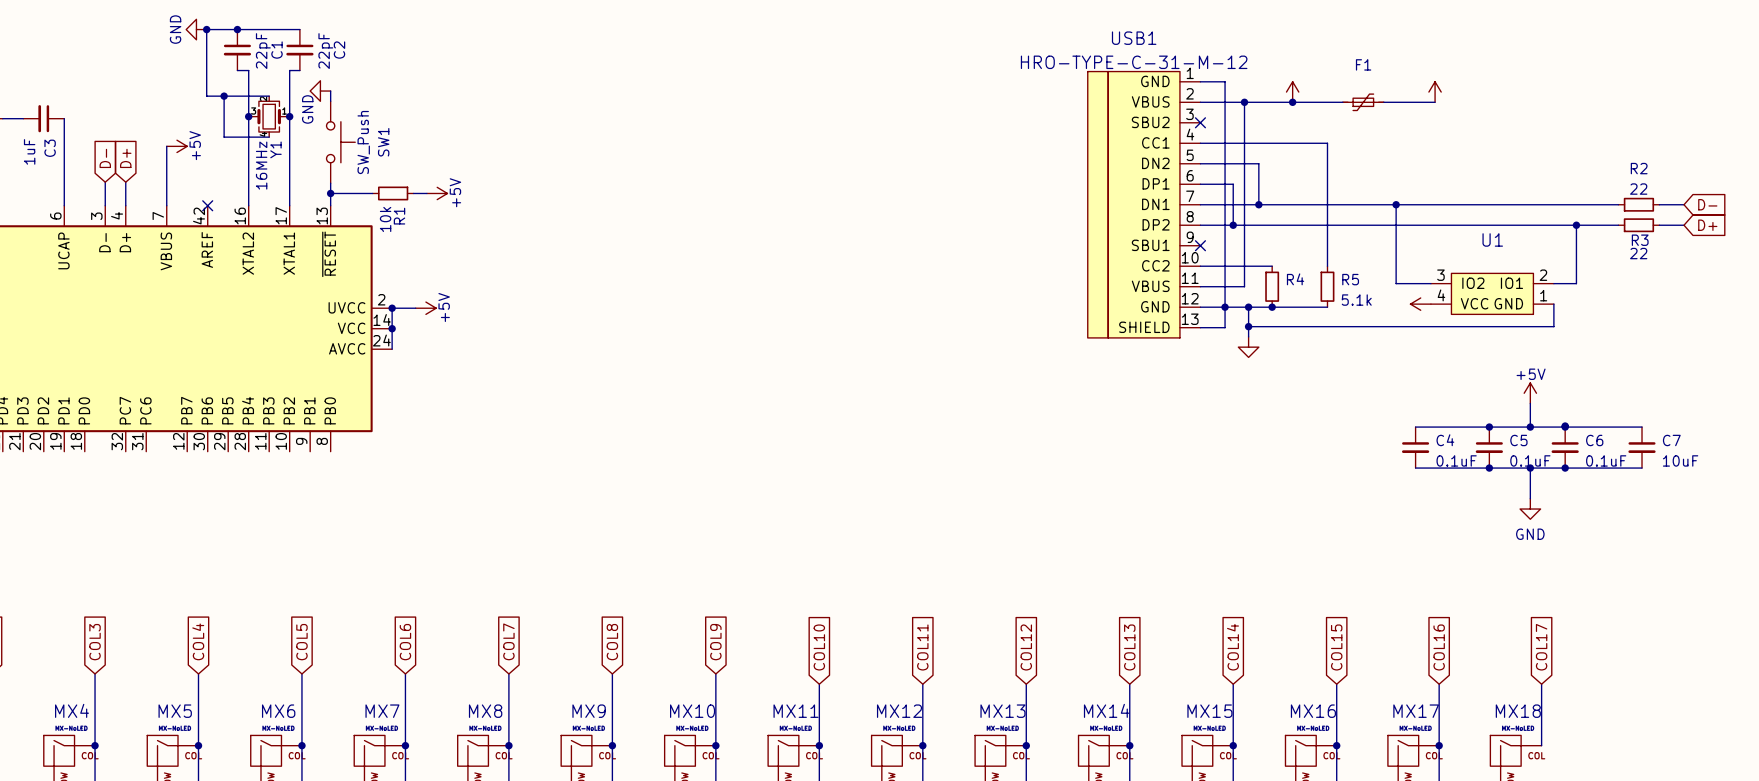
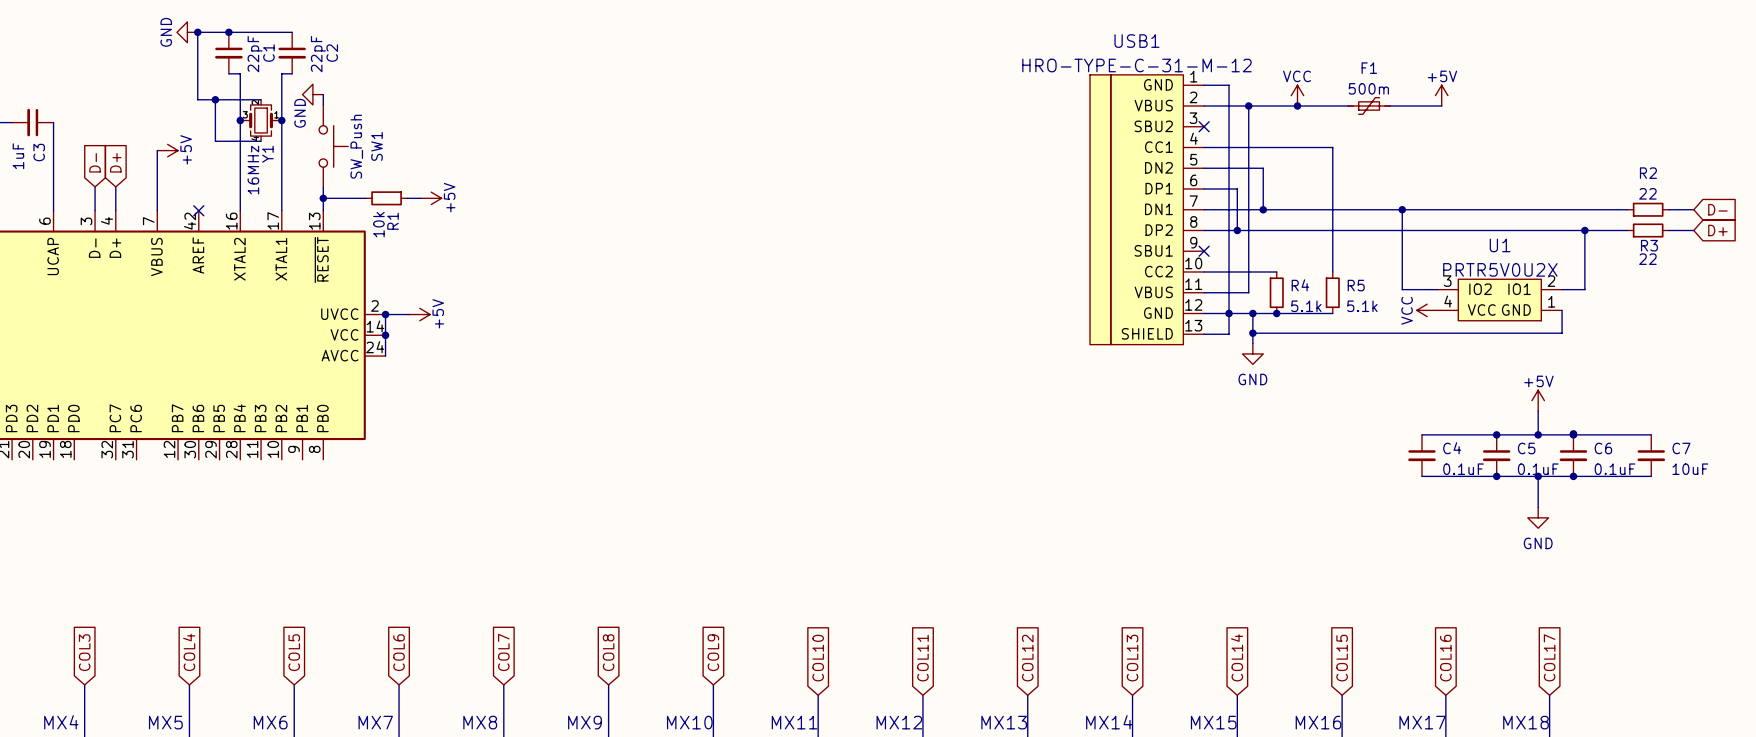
power symbol text: none -> VCC (1297, 76)
power symbol text: none -> +5V (1442, 76)
F1 value: none -> 500m (1368, 88)
U1 value: none -> PRTR5V0U2X (1500, 269)
R4 value: none -> 5.1k (1306, 306)
power symbol text: none -> VCC (1407, 310)
power symbol text: none -> GND (1252, 379)

